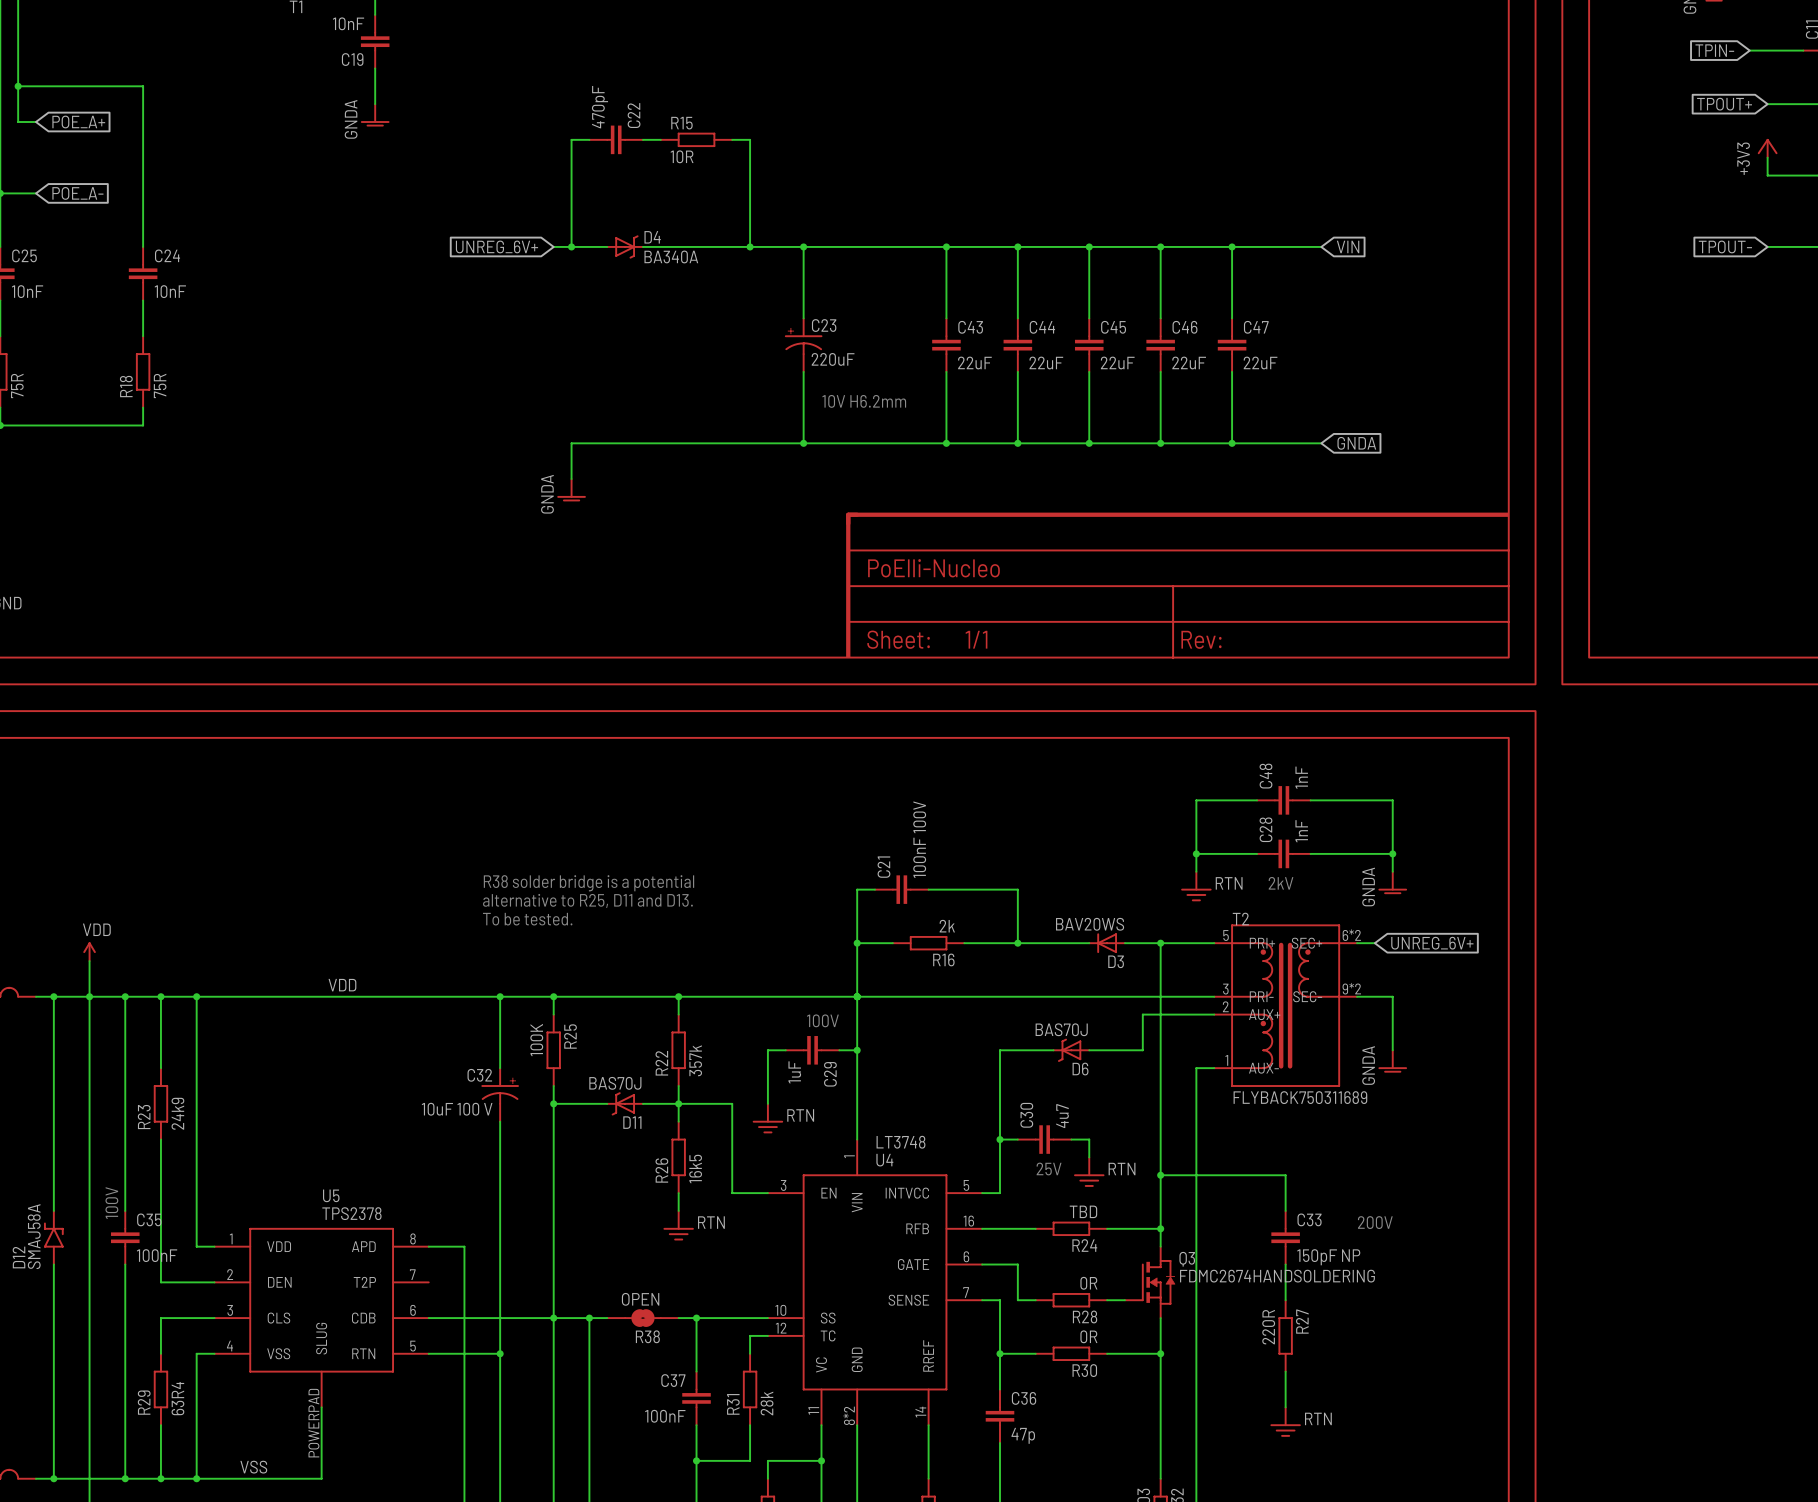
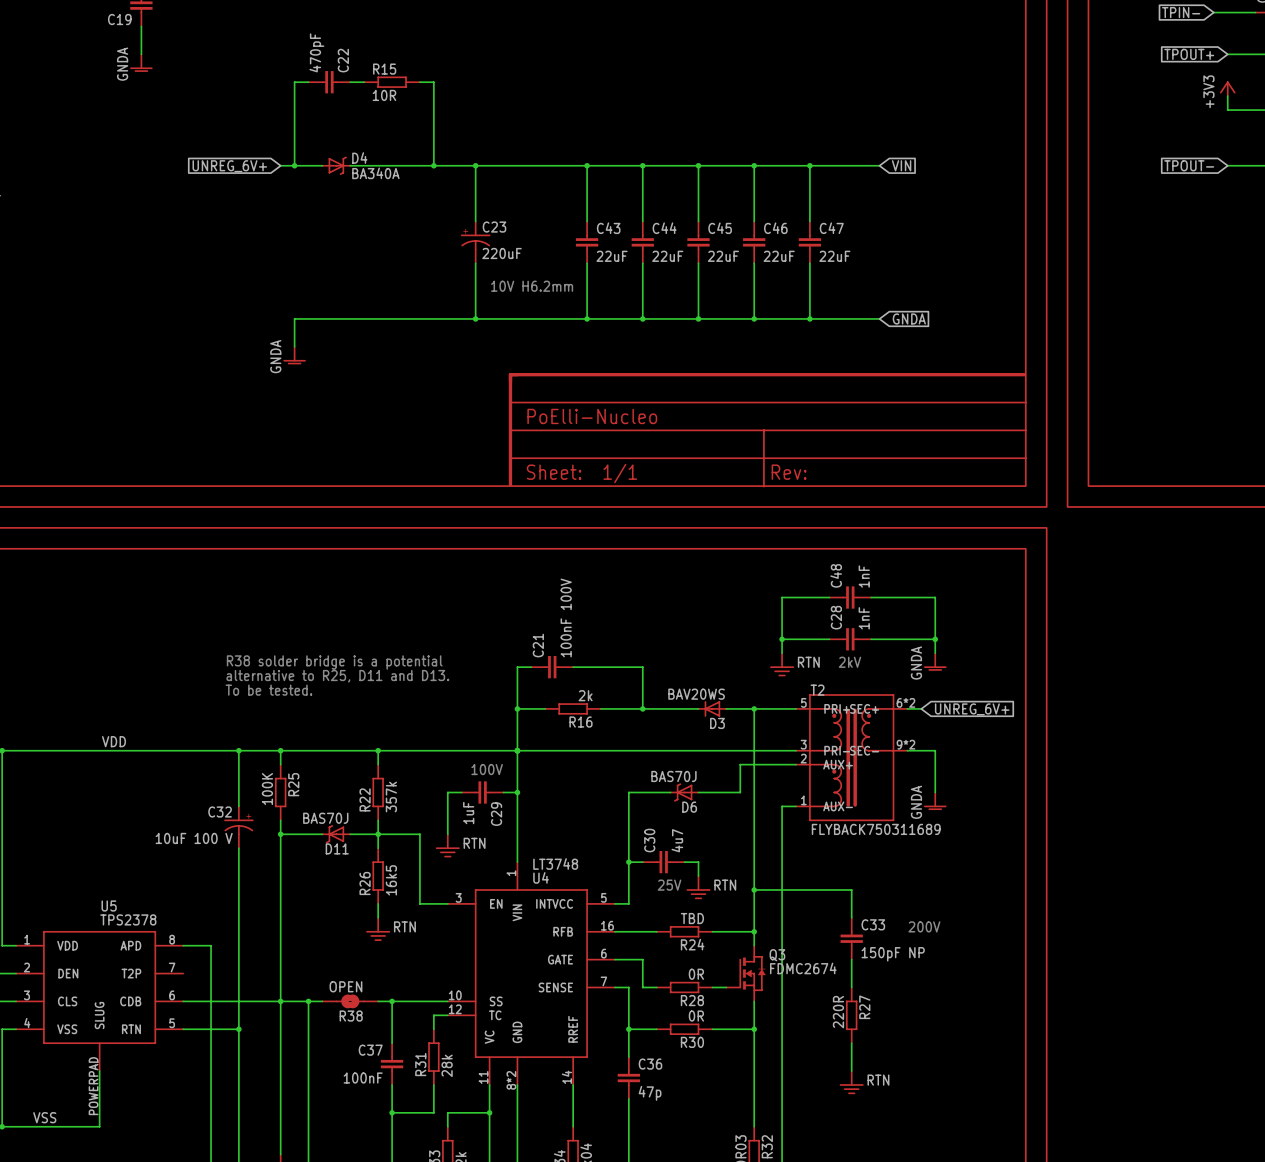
Q3 value: FDMC2674HANDSOLDERING (1277, 1276) -> FDMC2674 (803, 968)

